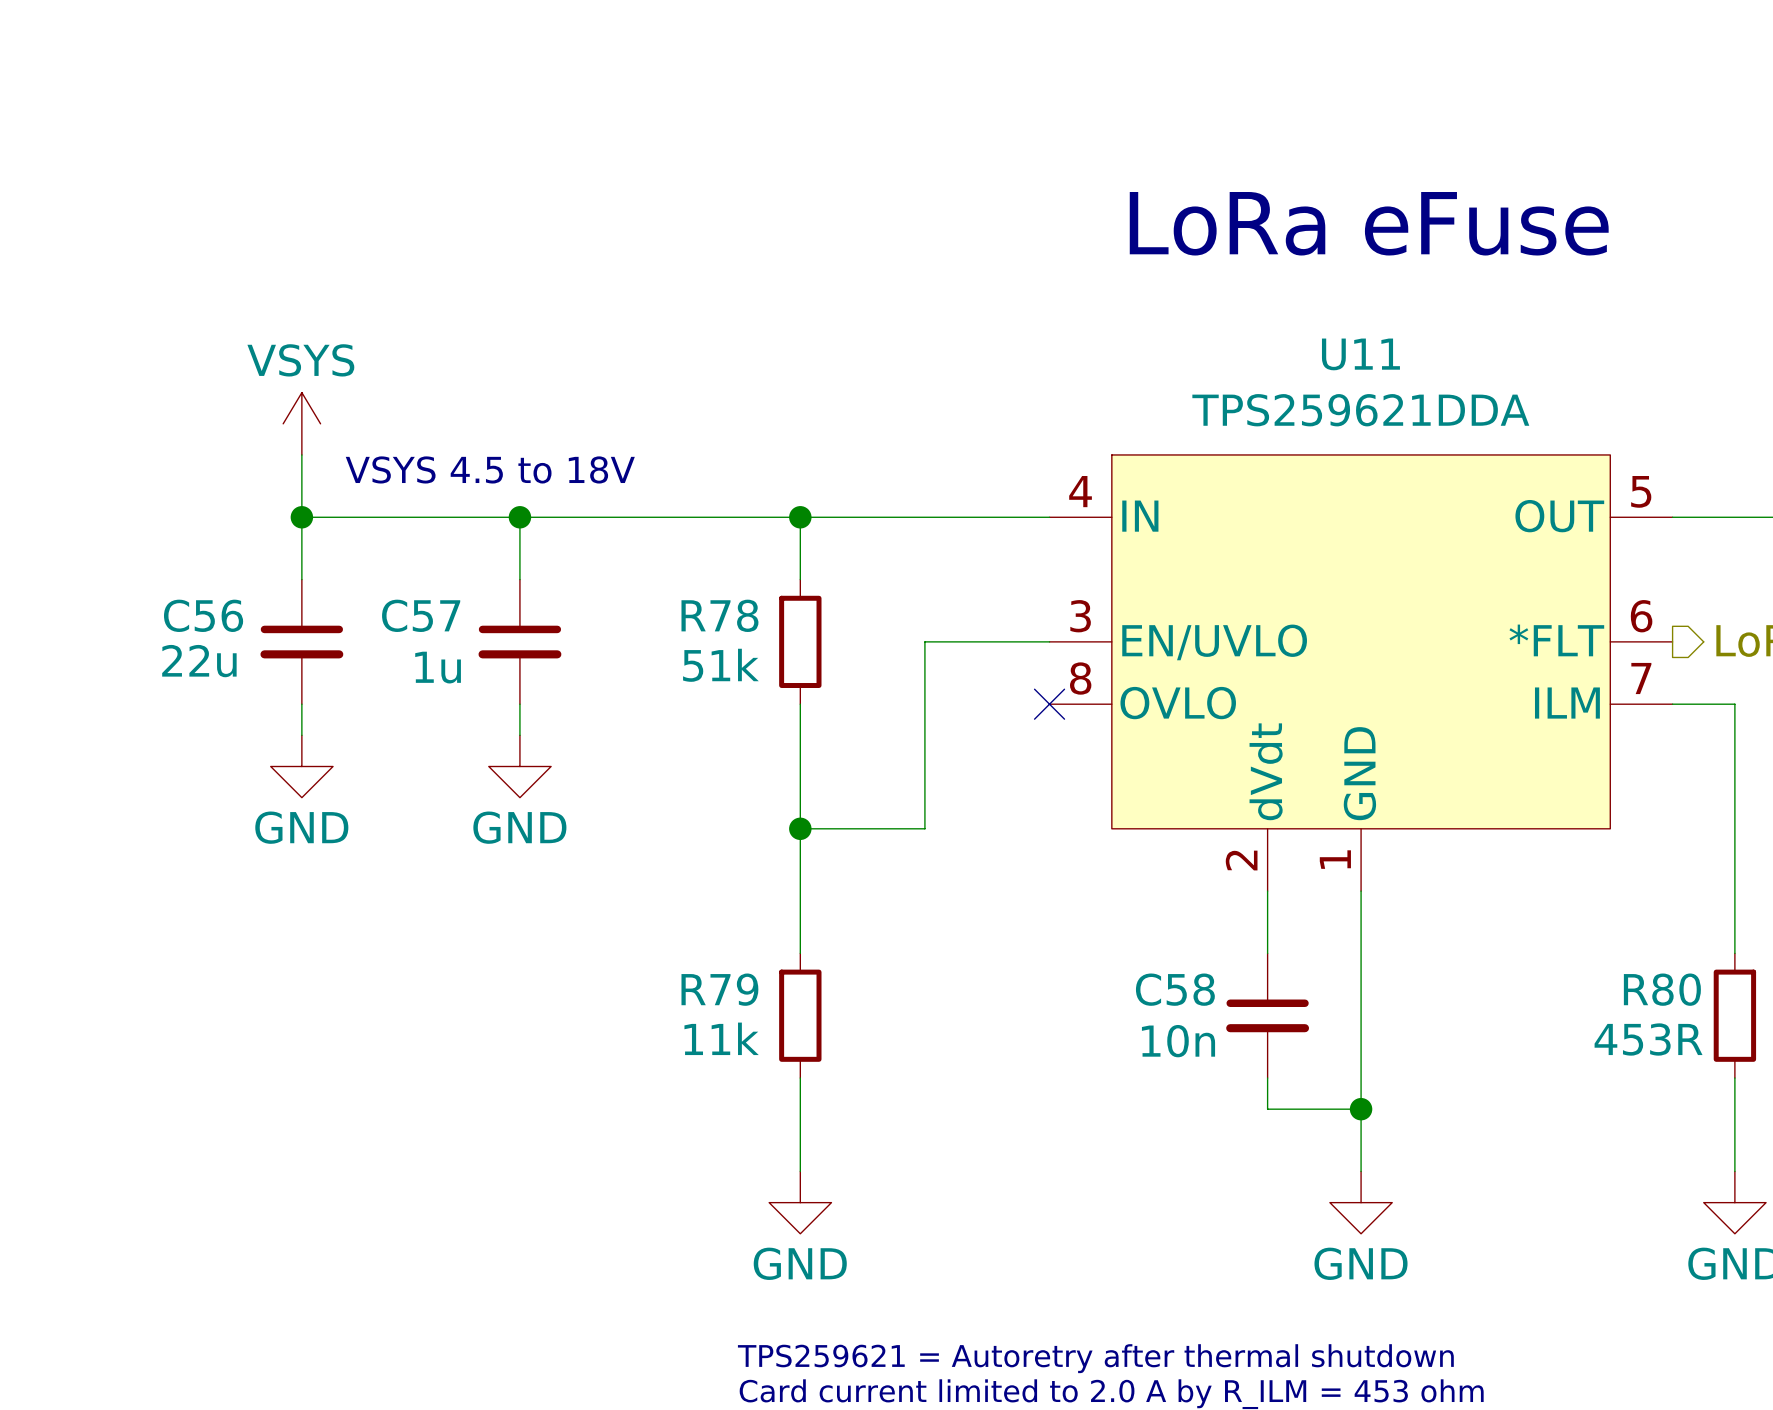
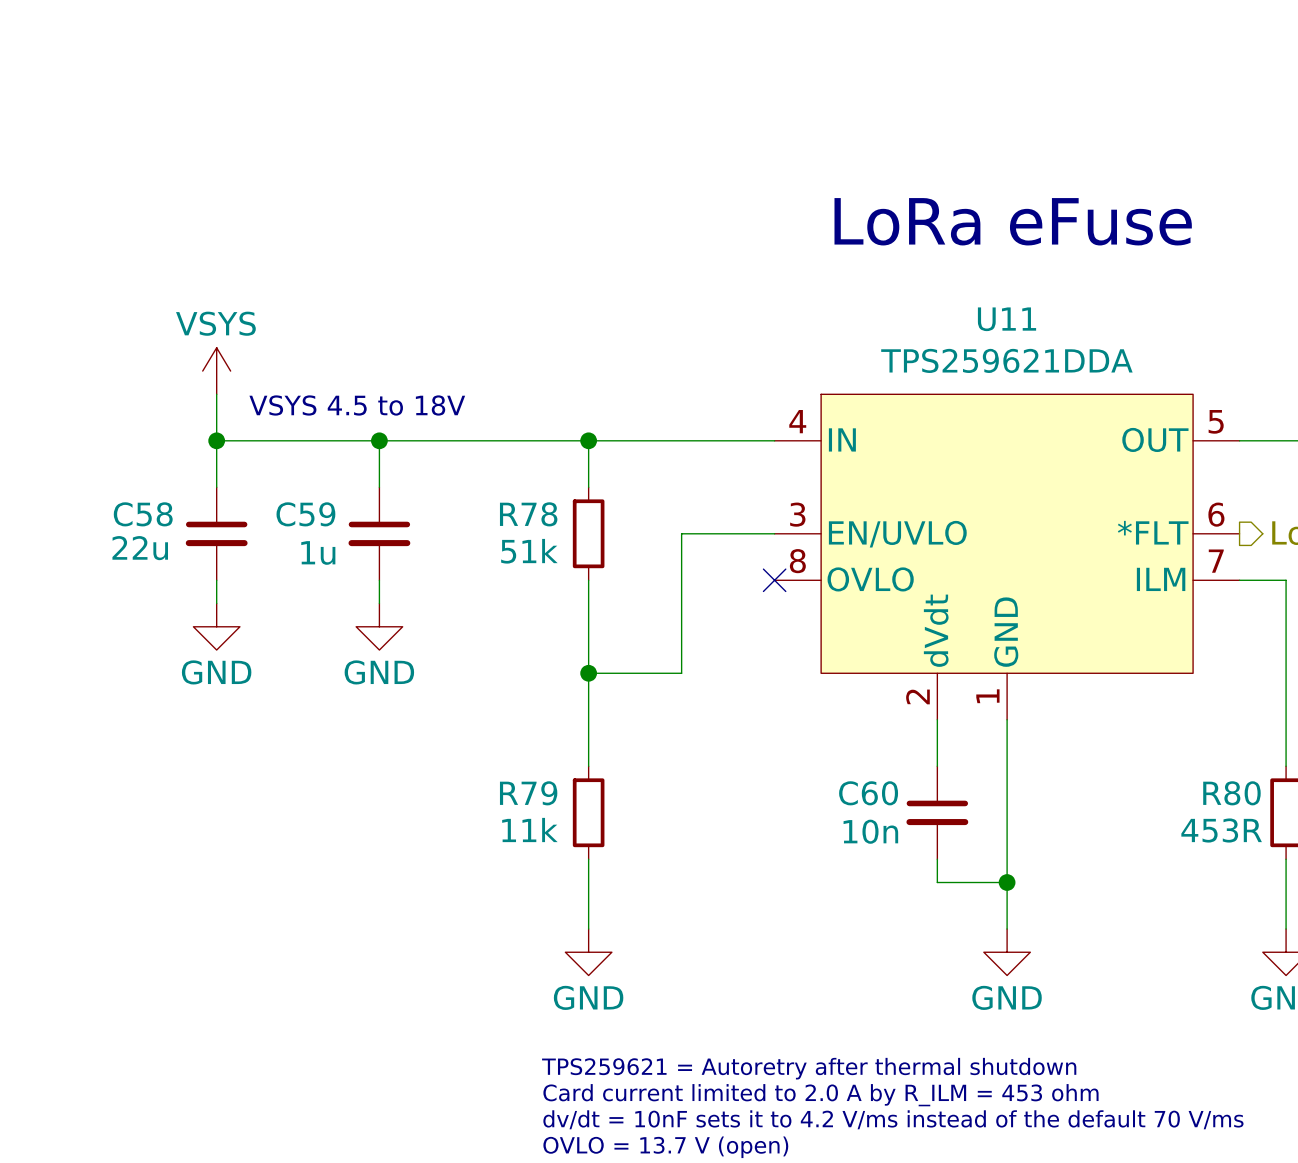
C56 name: C56 (203, 615) -> C58 (143, 514)
C57 name: C57 (421, 615) -> C59 (305, 514)
C58 name: C58 (1175, 989) -> C60 (868, 793)

